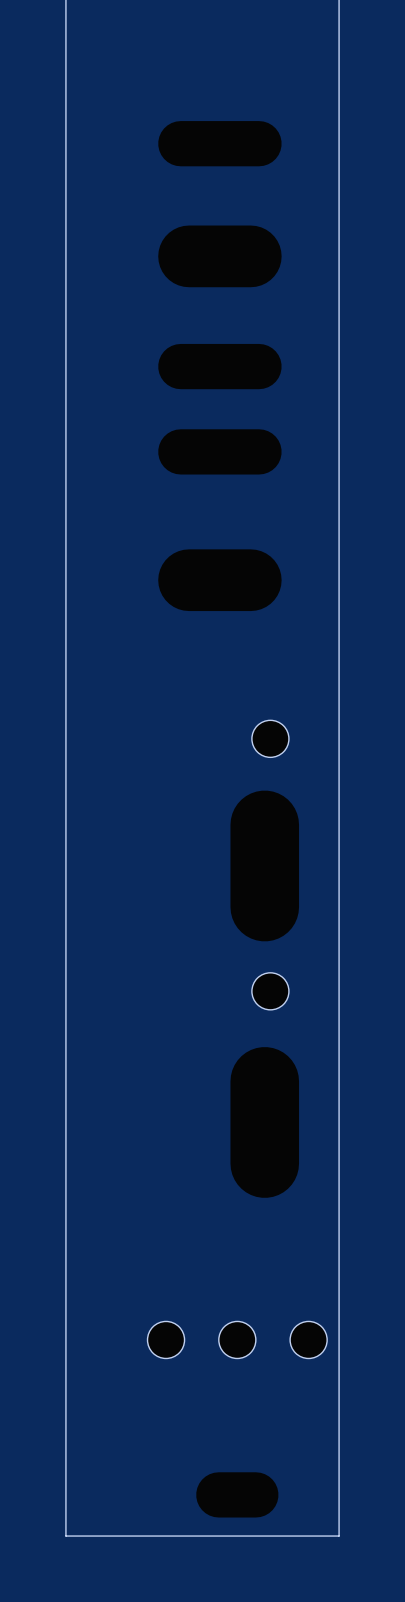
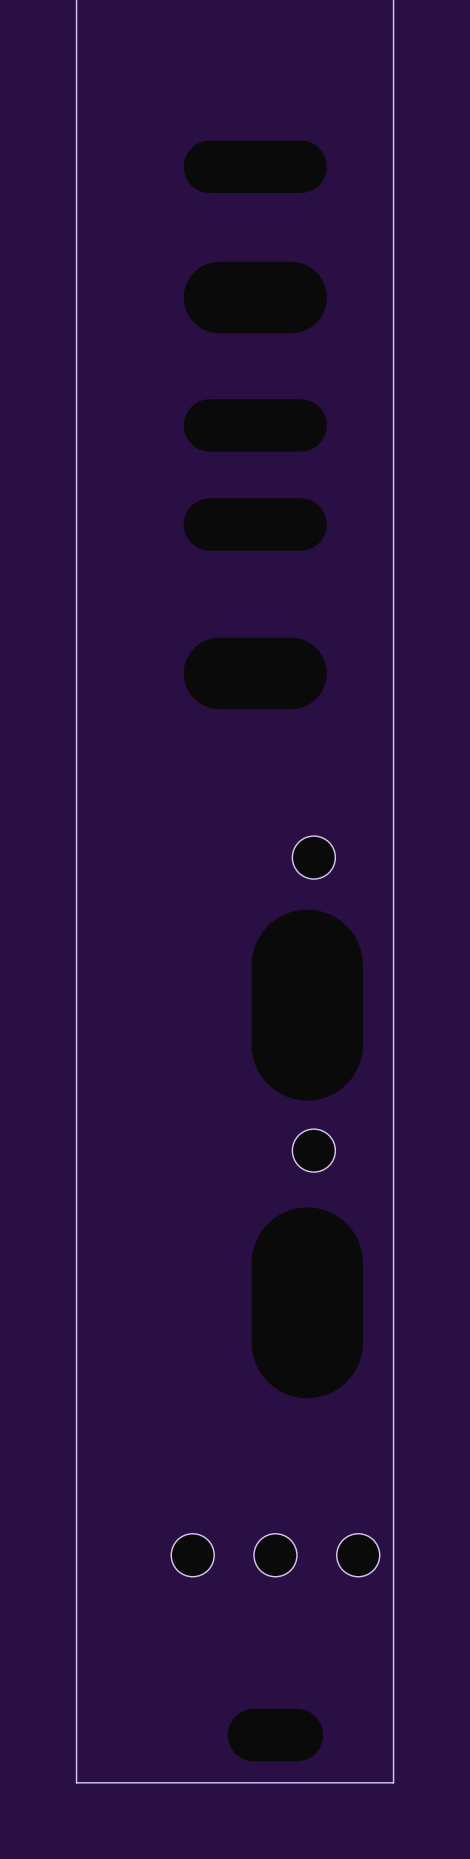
part footprint: [230, 790, 300, 942] -> [251, 909, 363, 1101]
part footprint: [230, 1047, 300, 1198] -> [251, 1207, 363, 1399]

